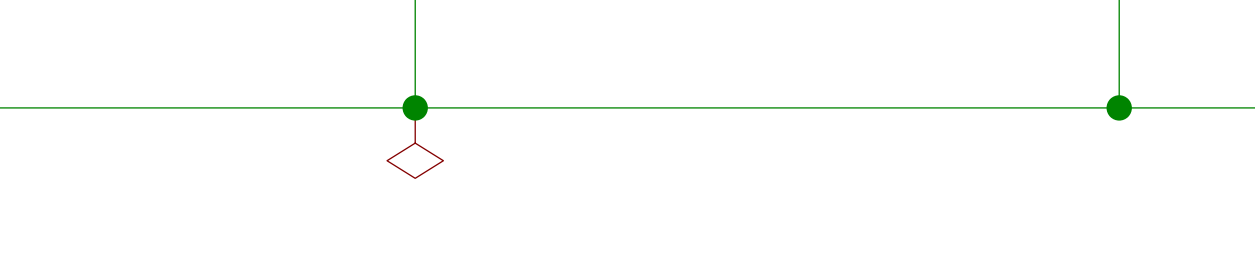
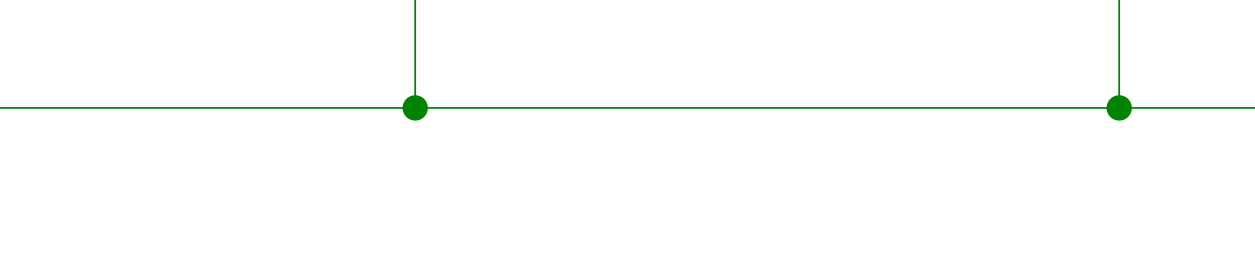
power symbol: (415, 143) -> none

